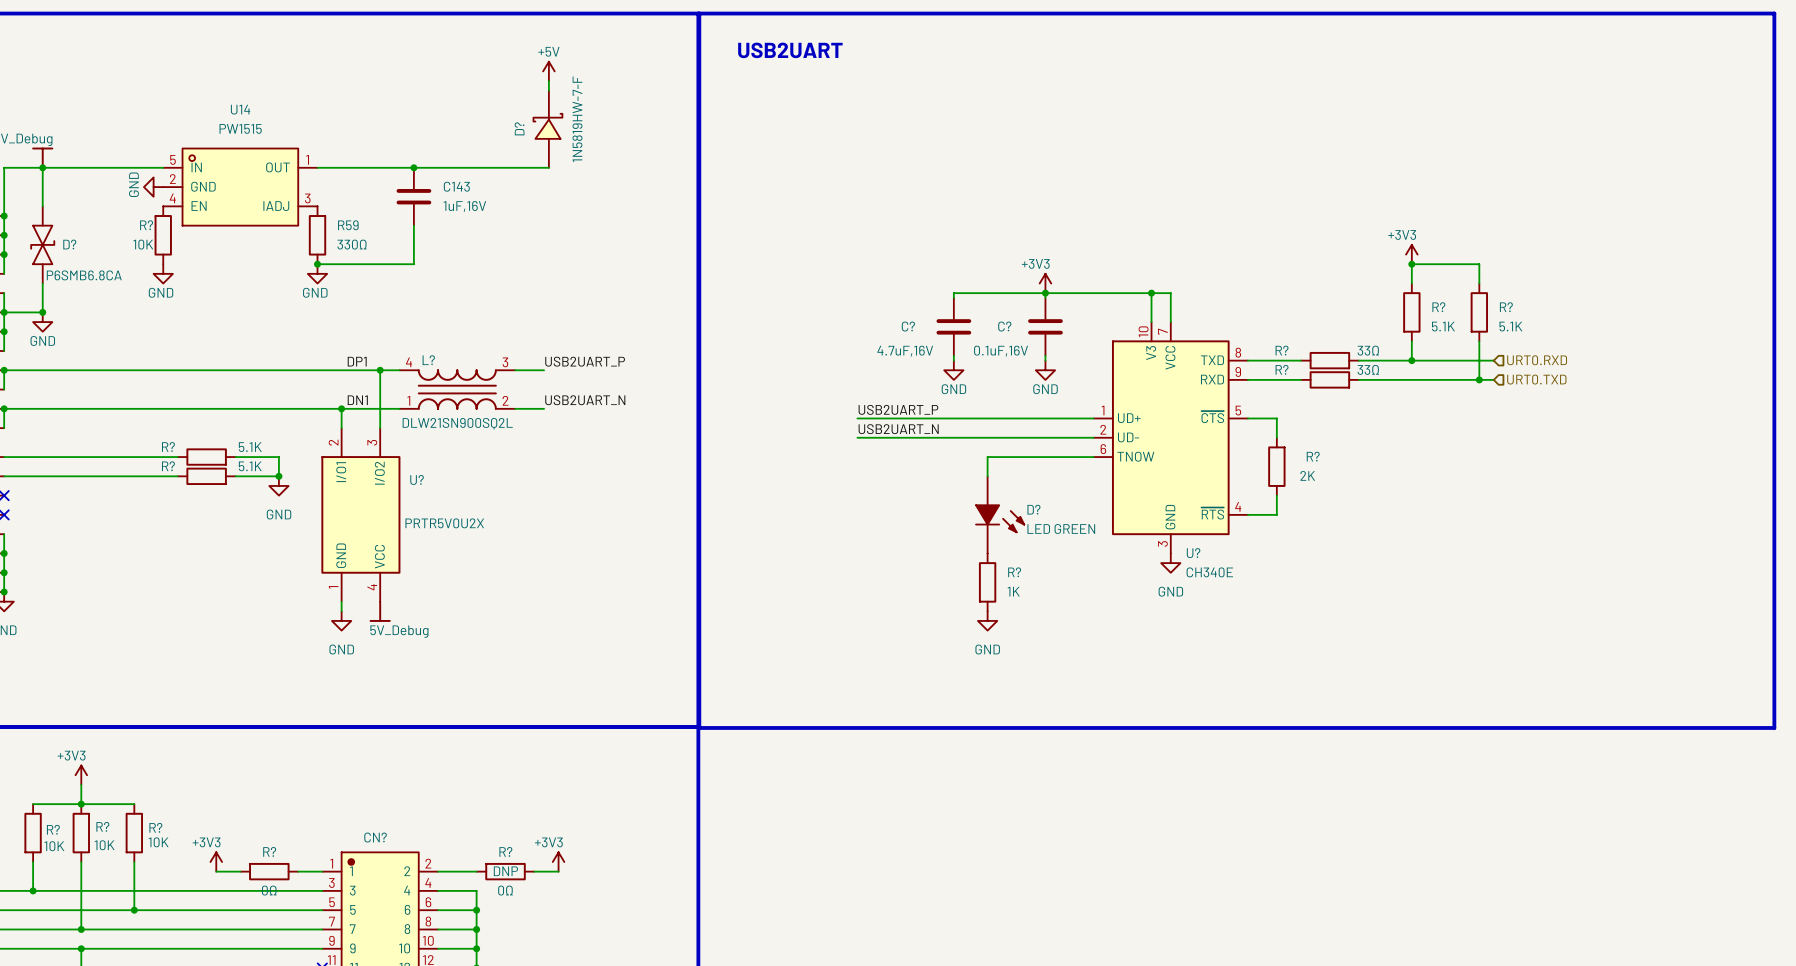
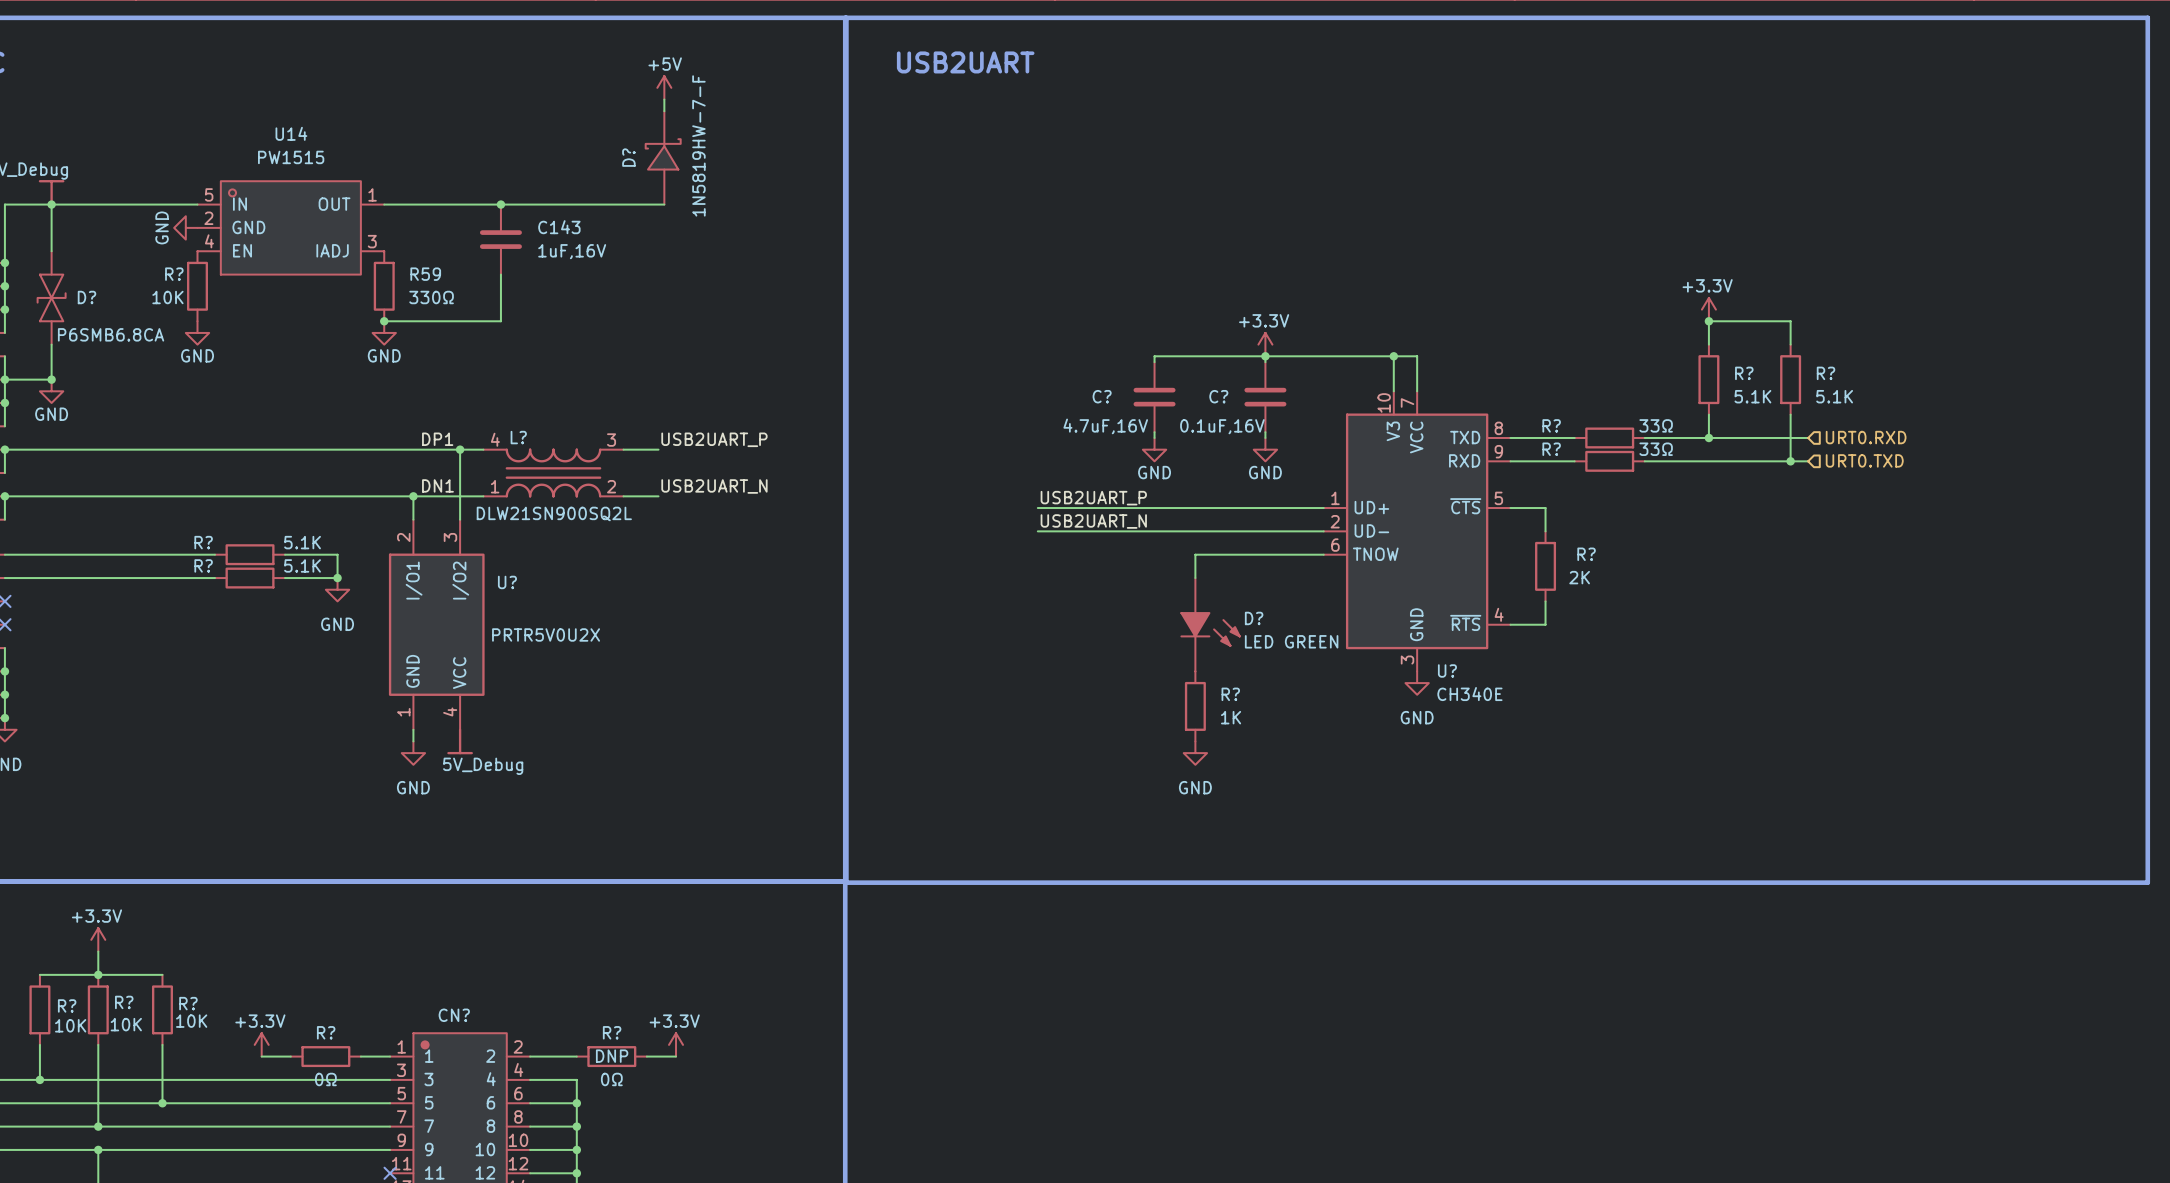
power symbol: +3V3 (1411, 254) -> +3.3V (1708, 309)
power symbol: +3V3 (1045, 283) -> +3.3V (1265, 344)
power symbol: +3V3 (81, 775) -> +3.3V (98, 939)
power symbol: +3V3 (216, 861) -> +3.3V (261, 1044)
power symbol: +3V3 (558, 861) -> +3.3V (676, 1044)

